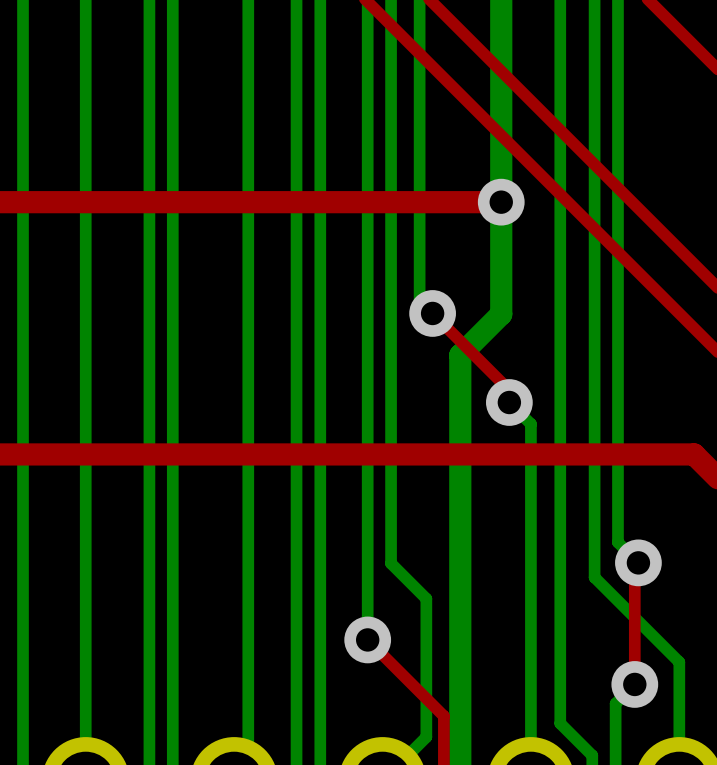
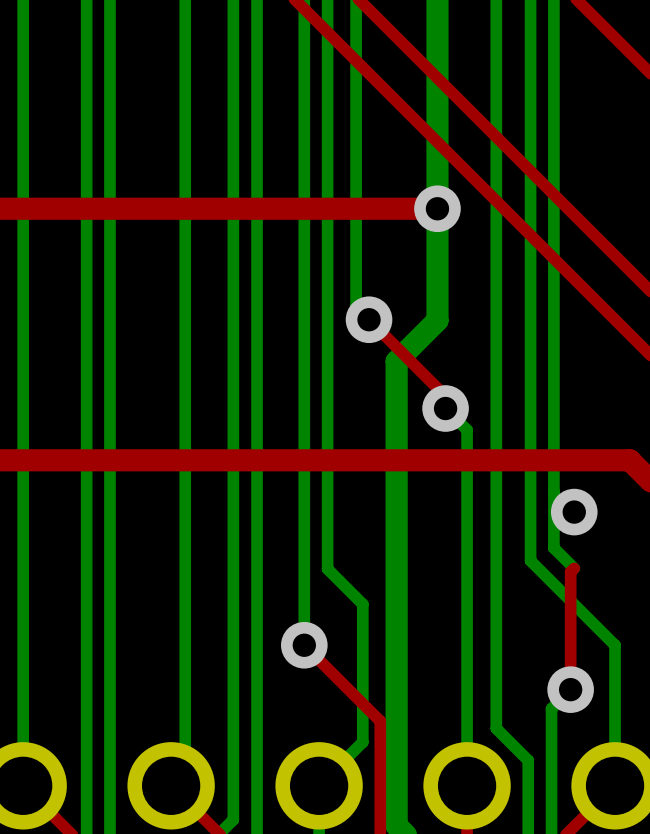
bottom track: (594, 555) (594, 577) (679, 662) -> (530, 560) (615, 645) (615, 667)
via position: (638, 562) -> (574, 512)

